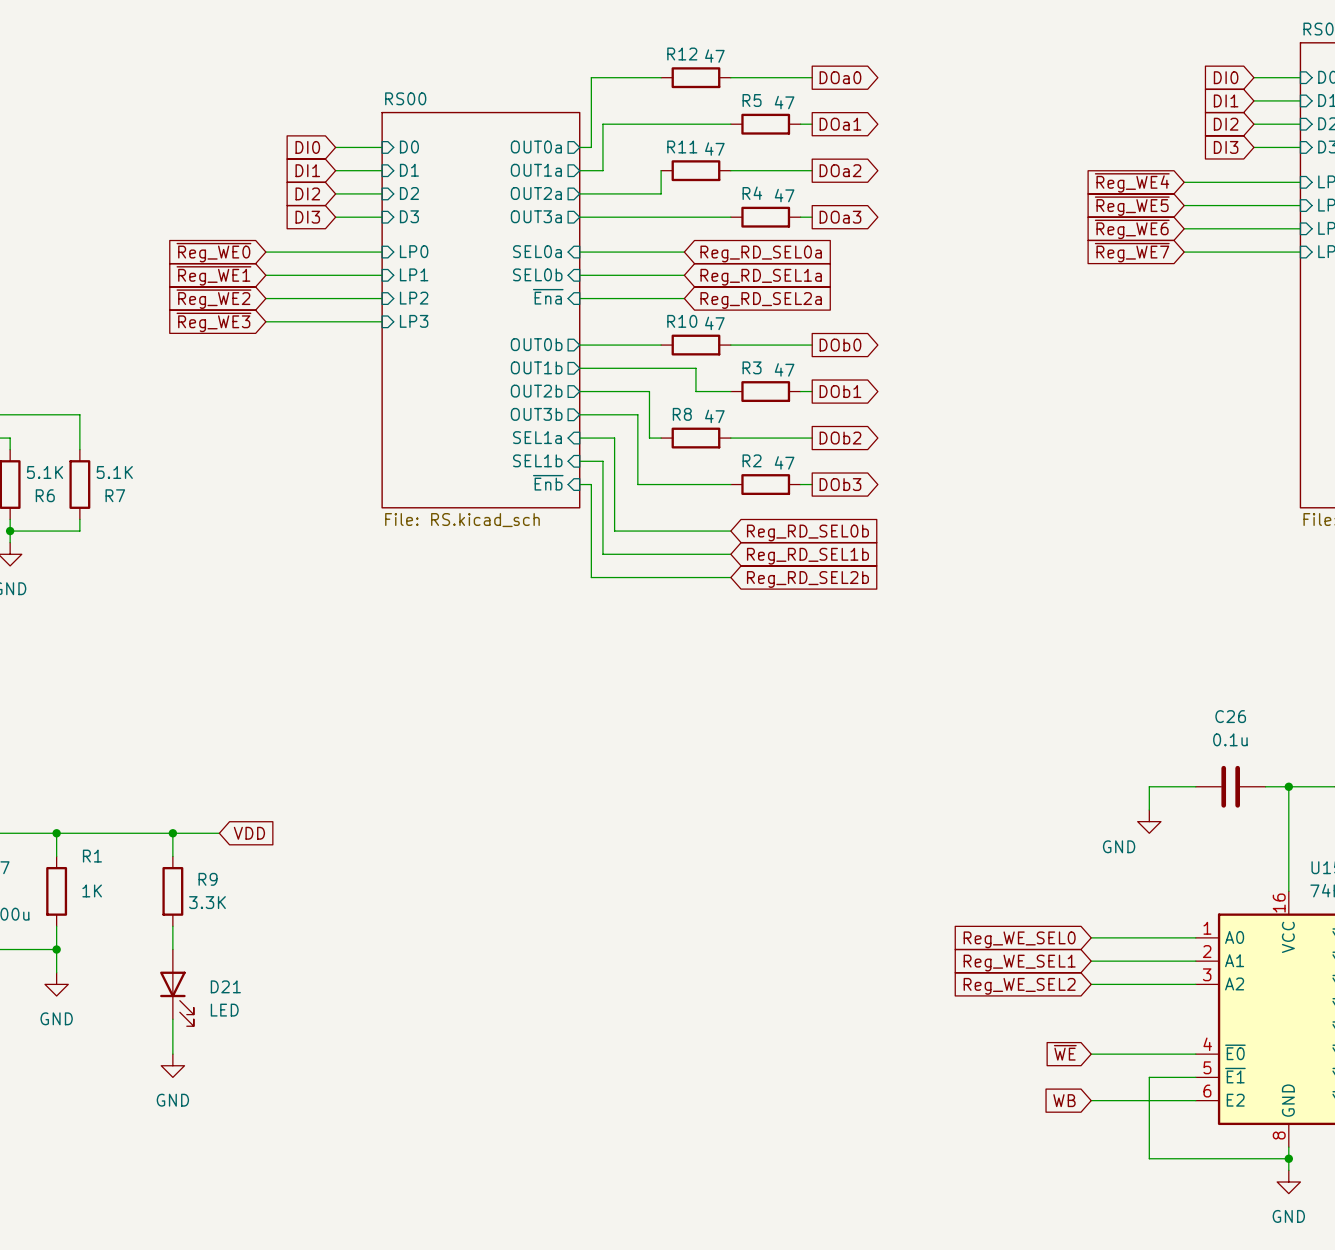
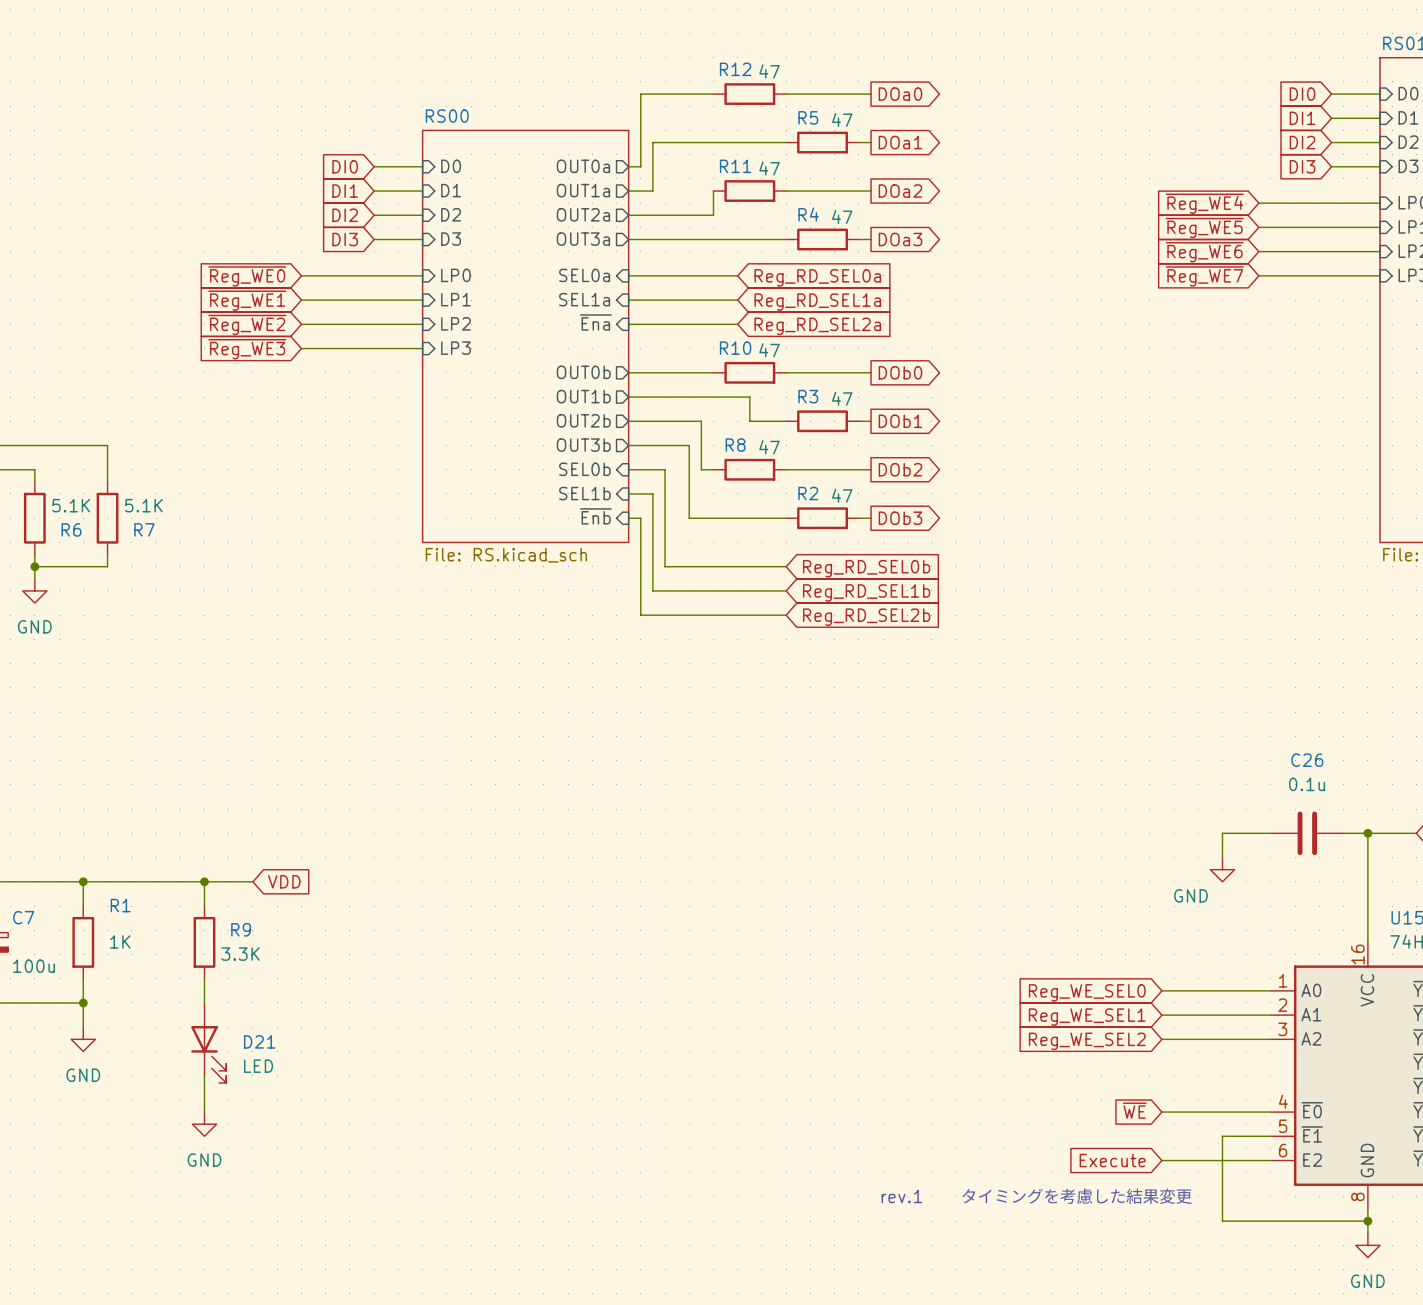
sheet pin: SEL0b (537, 274) -> SEL1a (584, 299)
sheet pin: SEL1a (537, 437) -> SEL0b (584, 469)
global label: WB (1064, 1100) -> Execute (1112, 1160)
text: none -> rev.1 タイミングを考慮した結果変更 (1037, 1196)

